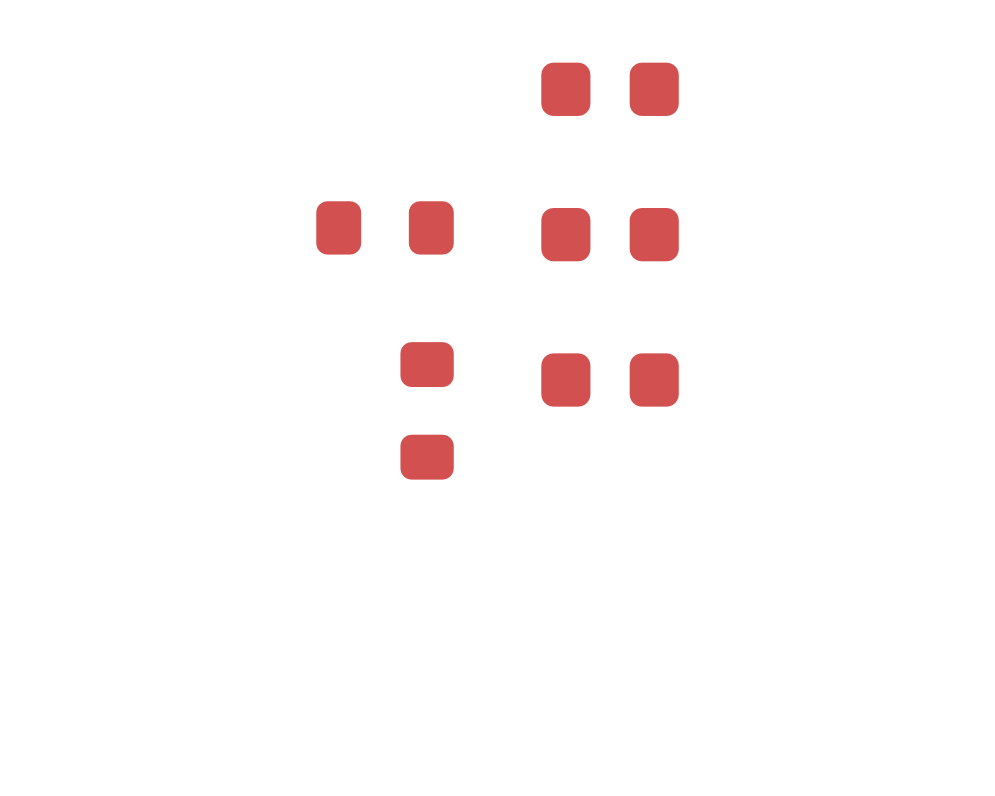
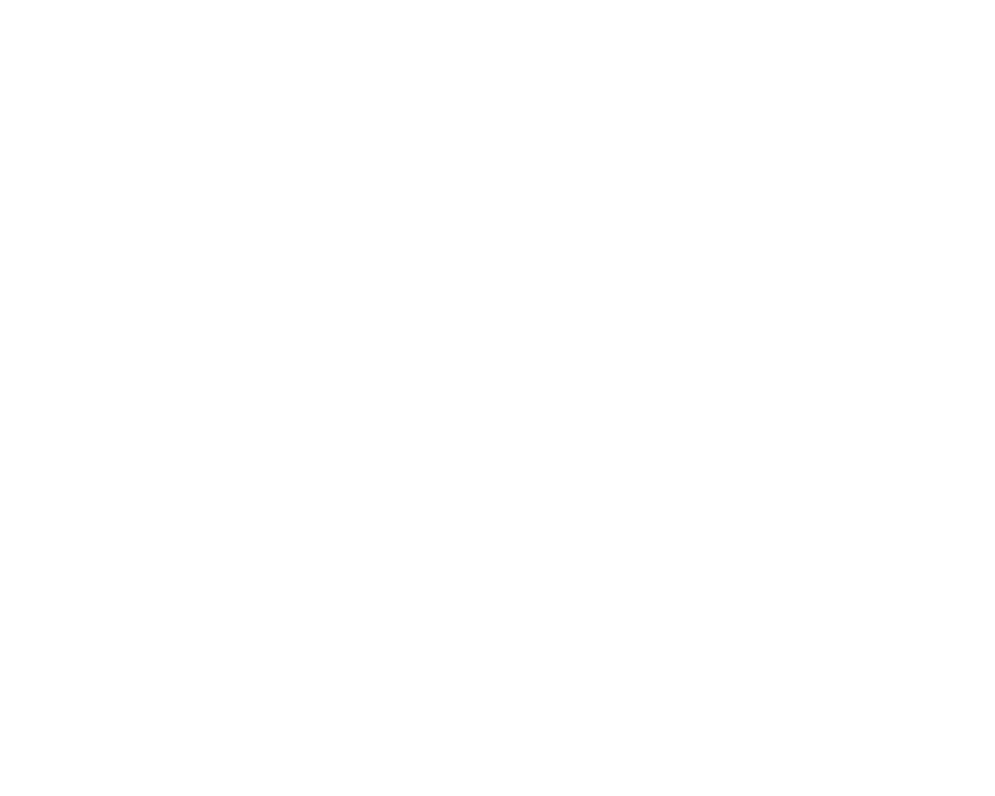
part: (610, 89) -> none
part: (385, 227) -> none
part: (610, 234) -> none
part: (610, 380) -> none
part: (427, 410) -> none

